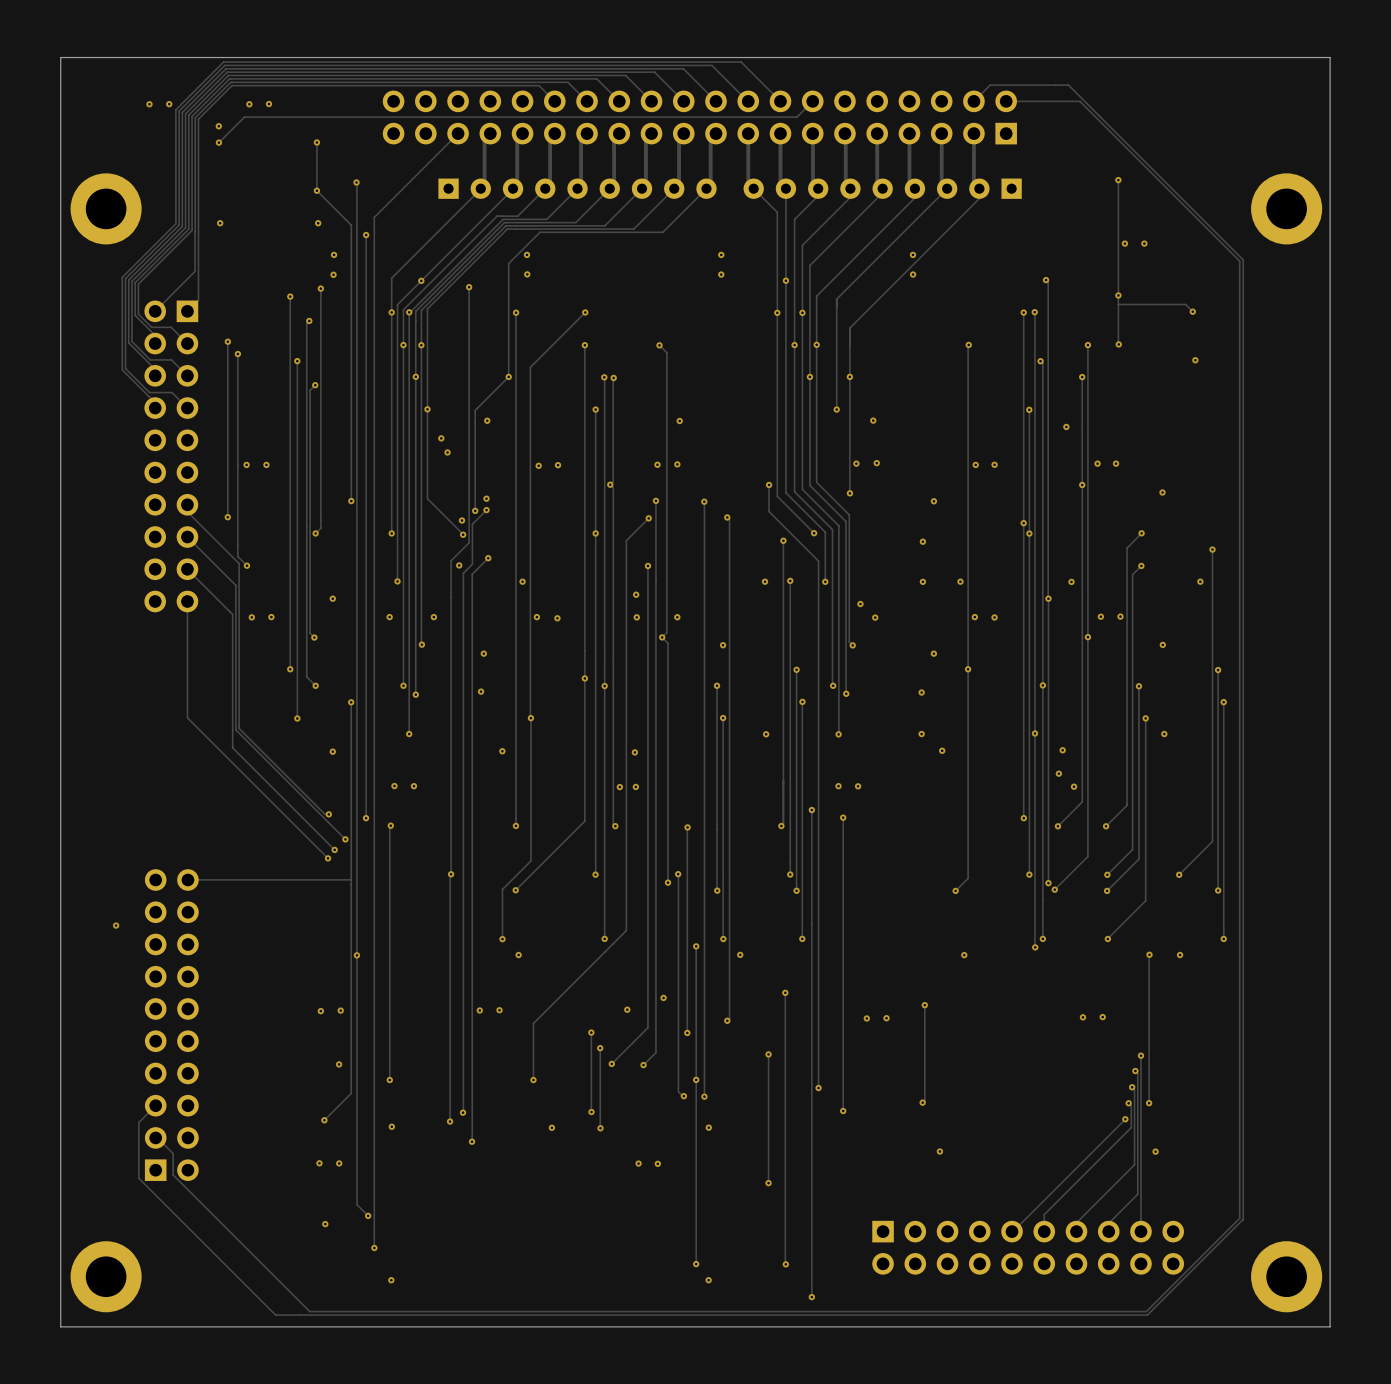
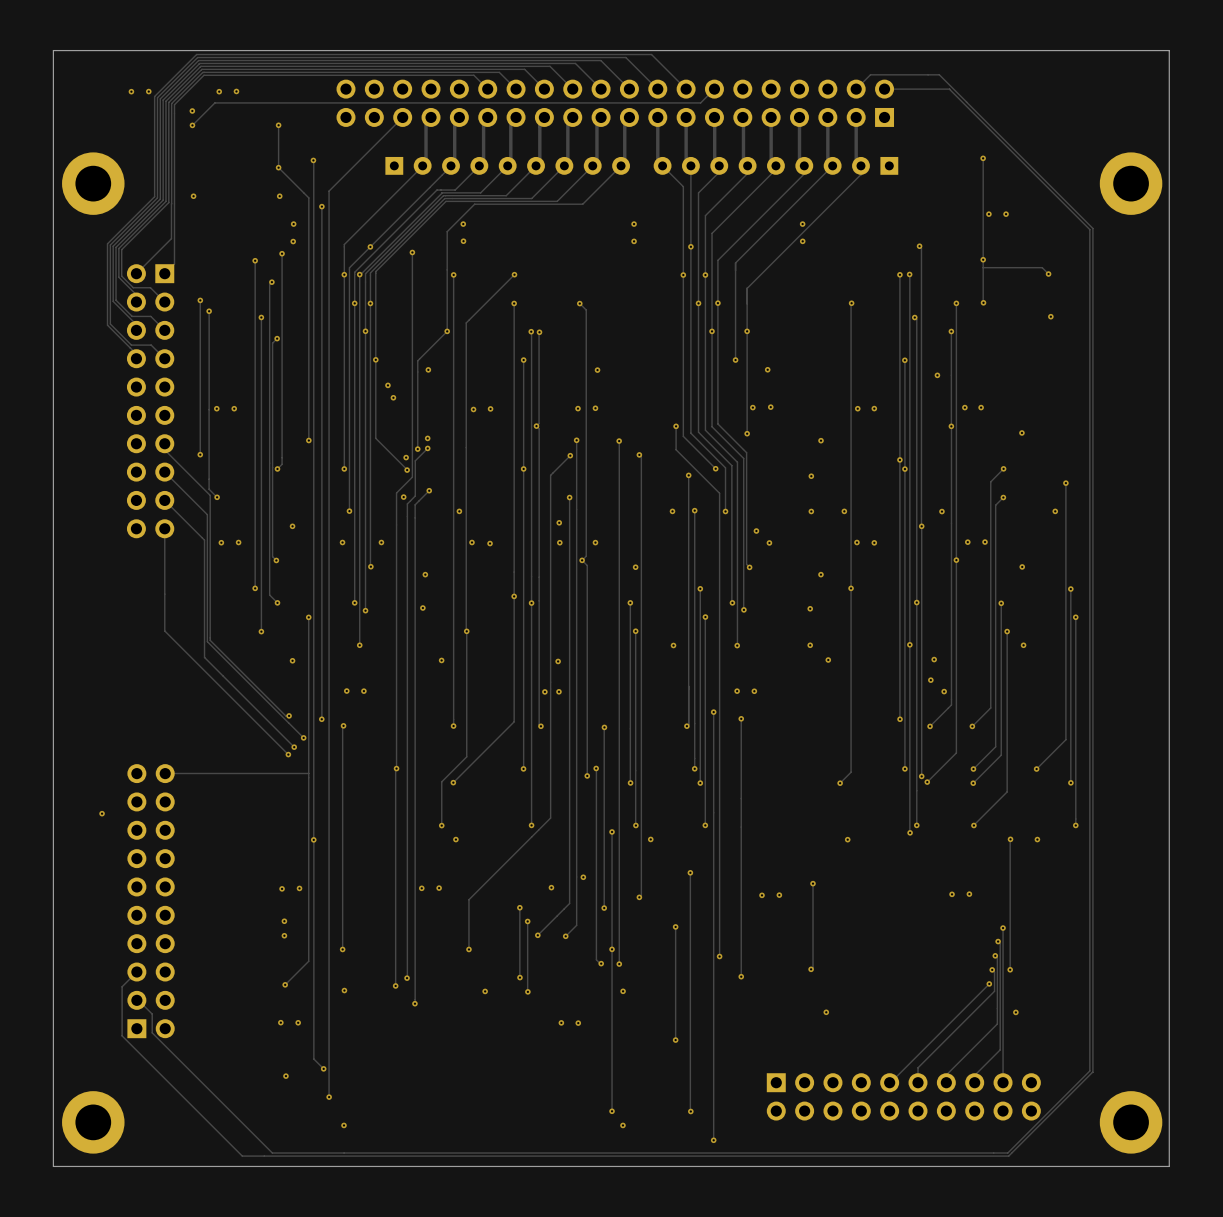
via: none -> (284, 921)
via: none -> (284, 935)
via: (339, 1064) -> none

